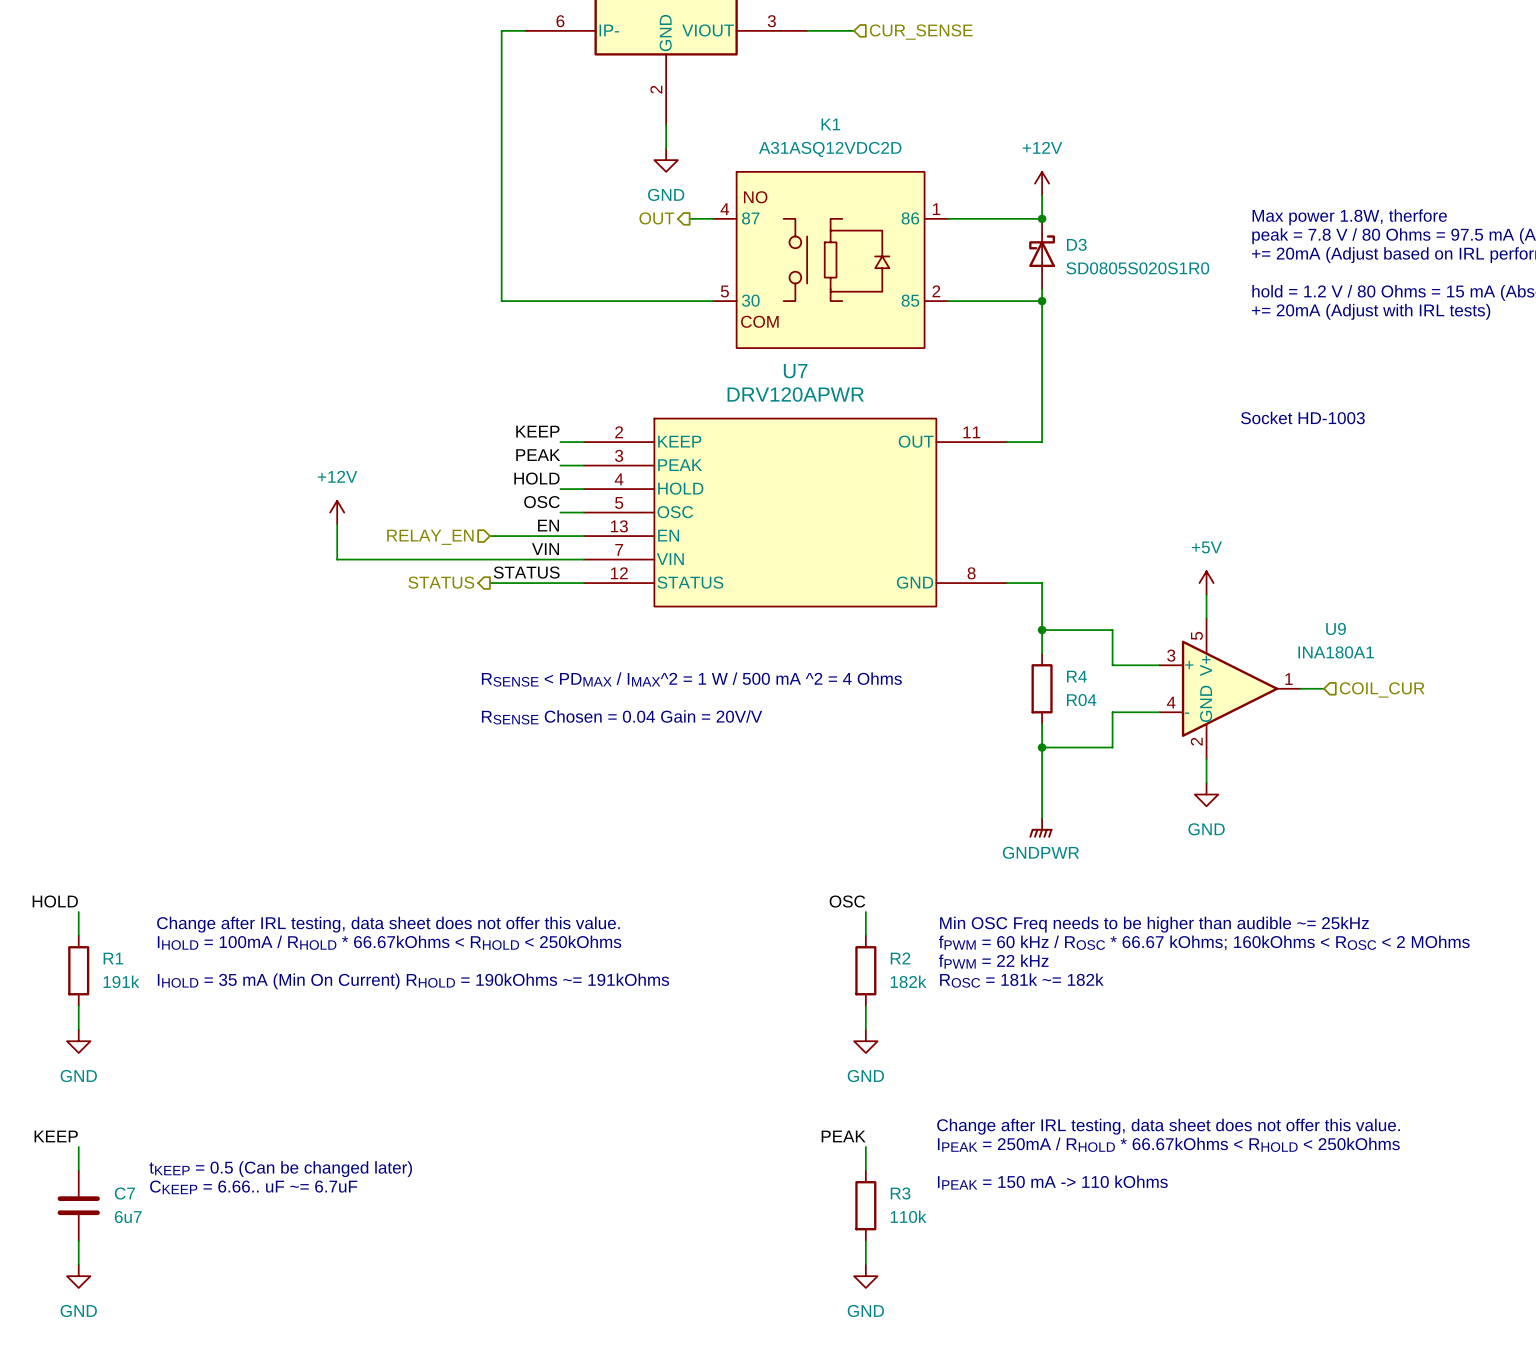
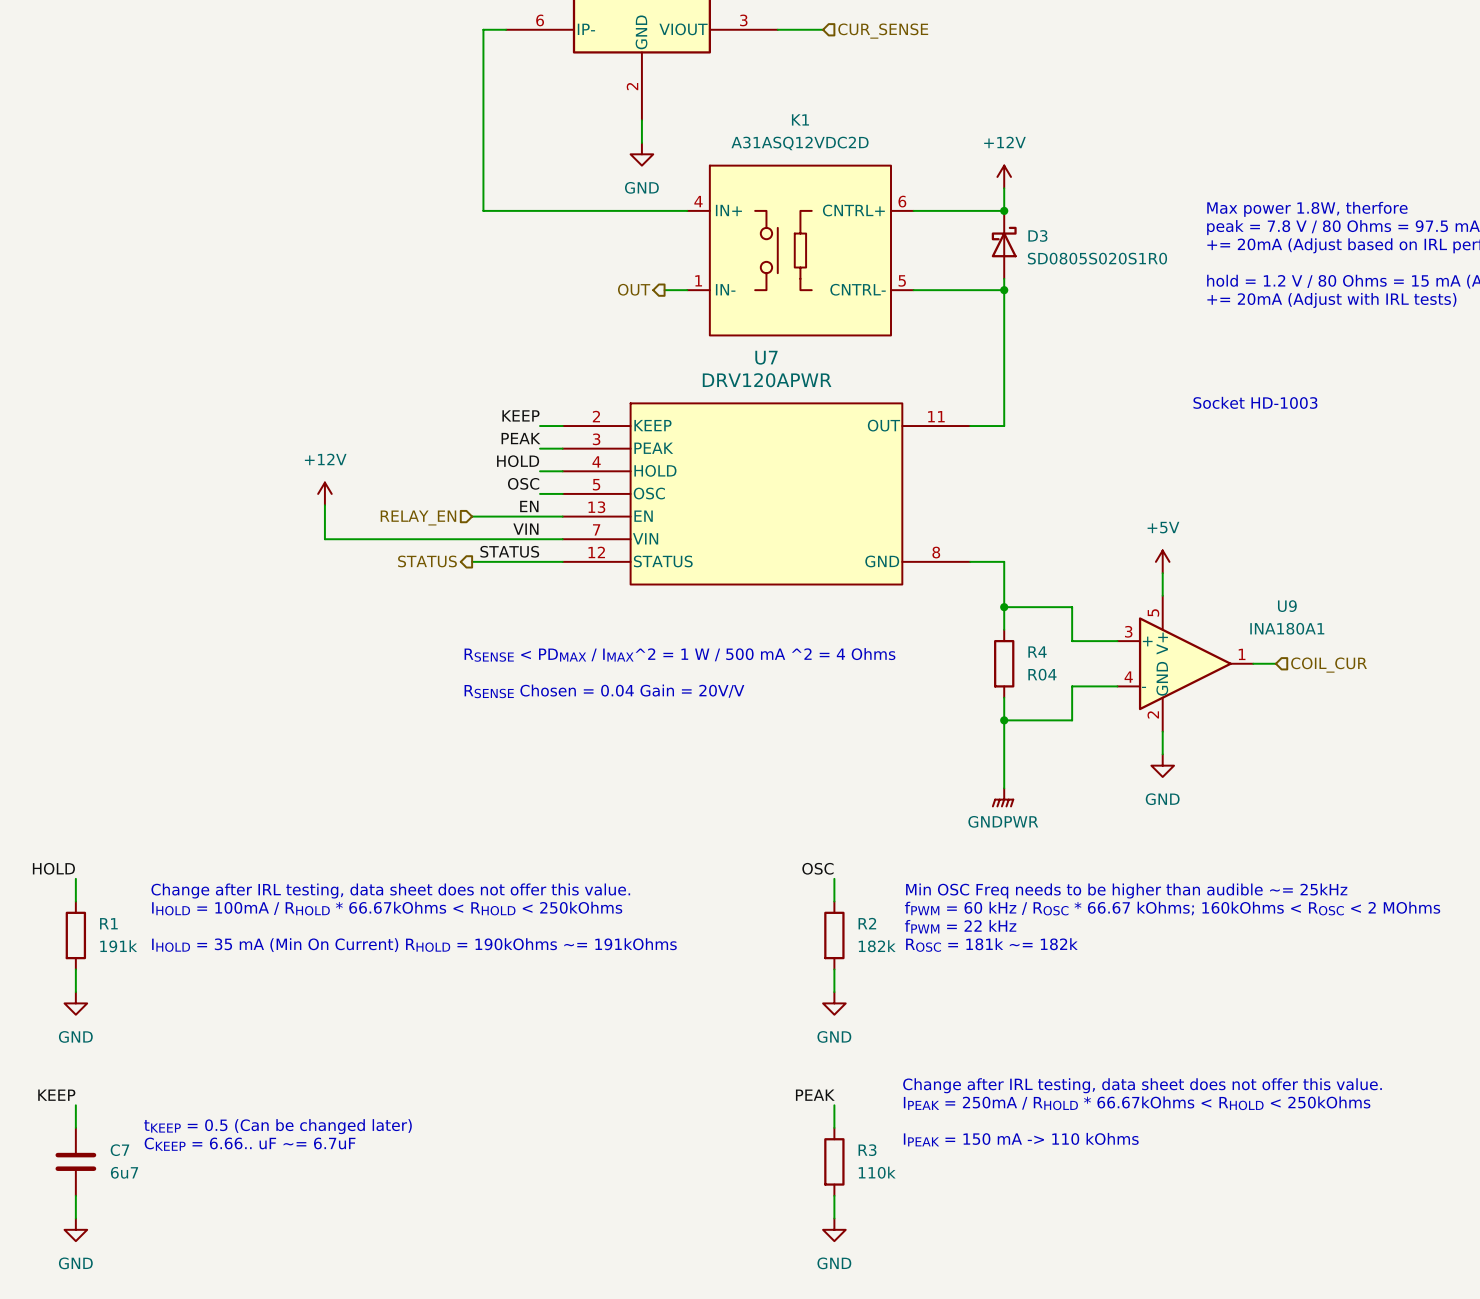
K1 symbol: [713, 171, 949, 349] -> [687, 165, 914, 336]
wire: (501, 218) (501, 301) (689, 301) -> (483, 210) (664, 210)
hierarchical label position: OUT (656, 218) -> OUT (634, 289)

